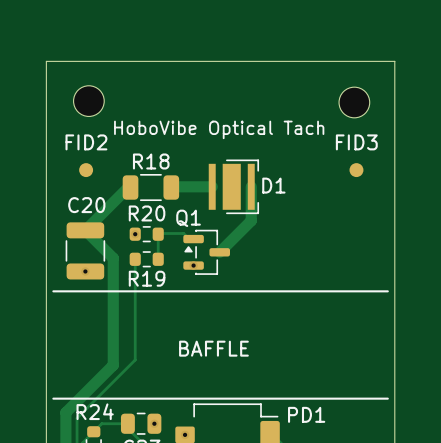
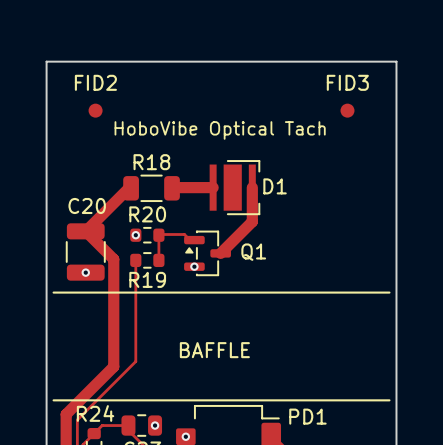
part: (88, 101) -> none
part: (354, 102) -> none
FID2 position: (86, 170) -> (95, 110)
FID3 position: (356, 170) -> (347, 110)
Q1 name position: Q1 (188, 218) -> Q1 (253, 252)

